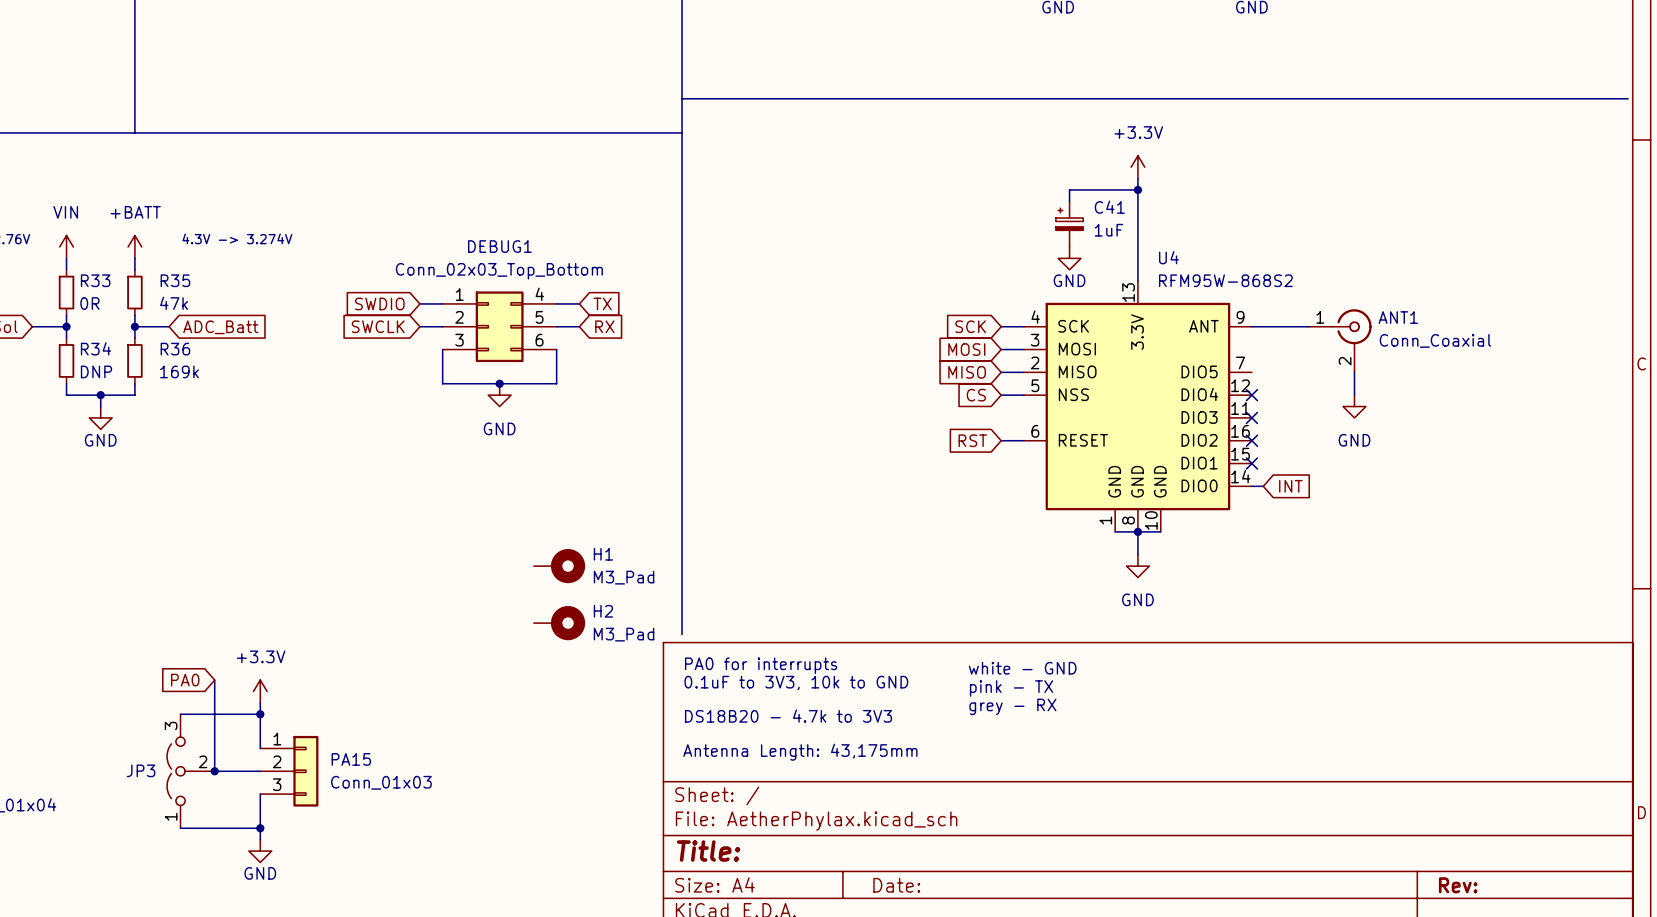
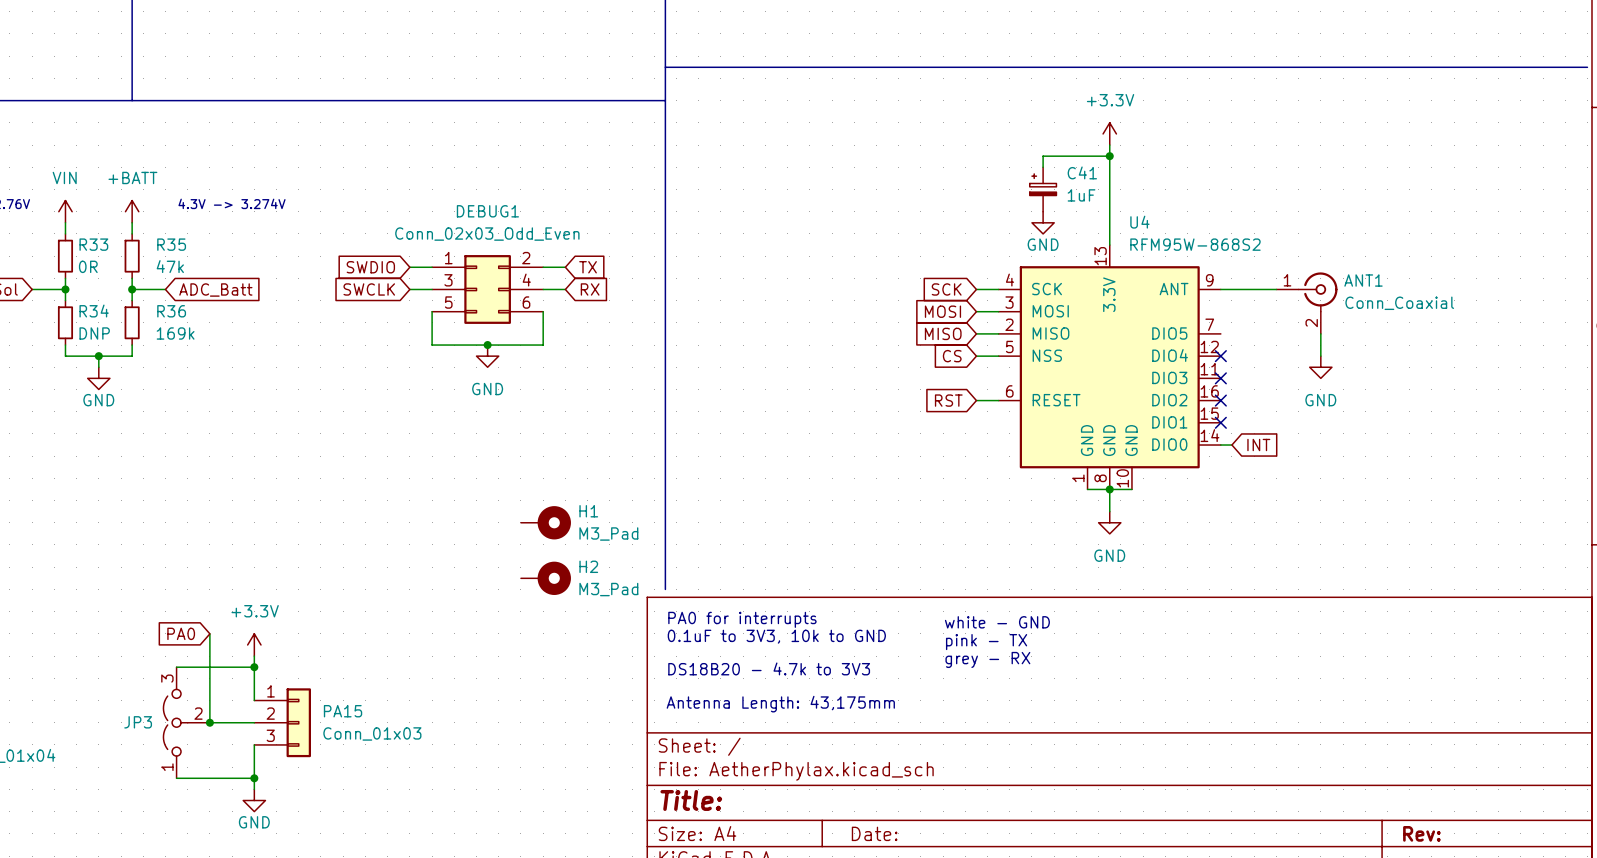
DEBUG1 value: Conn_02x03_Top_Bottom (499, 271) -> Conn_02x03_Odd_Even (487, 234)
DEBUG1 pin number: 4 (539, 294) -> 2 (526, 258)
DEBUG1 pin number: 2 (459, 317) -> 3 (448, 280)
DEBUG1 pin number: 5 (539, 317) -> 4 (526, 280)
DEBUG1 pin number: 3 (459, 340) -> 5 (448, 302)

